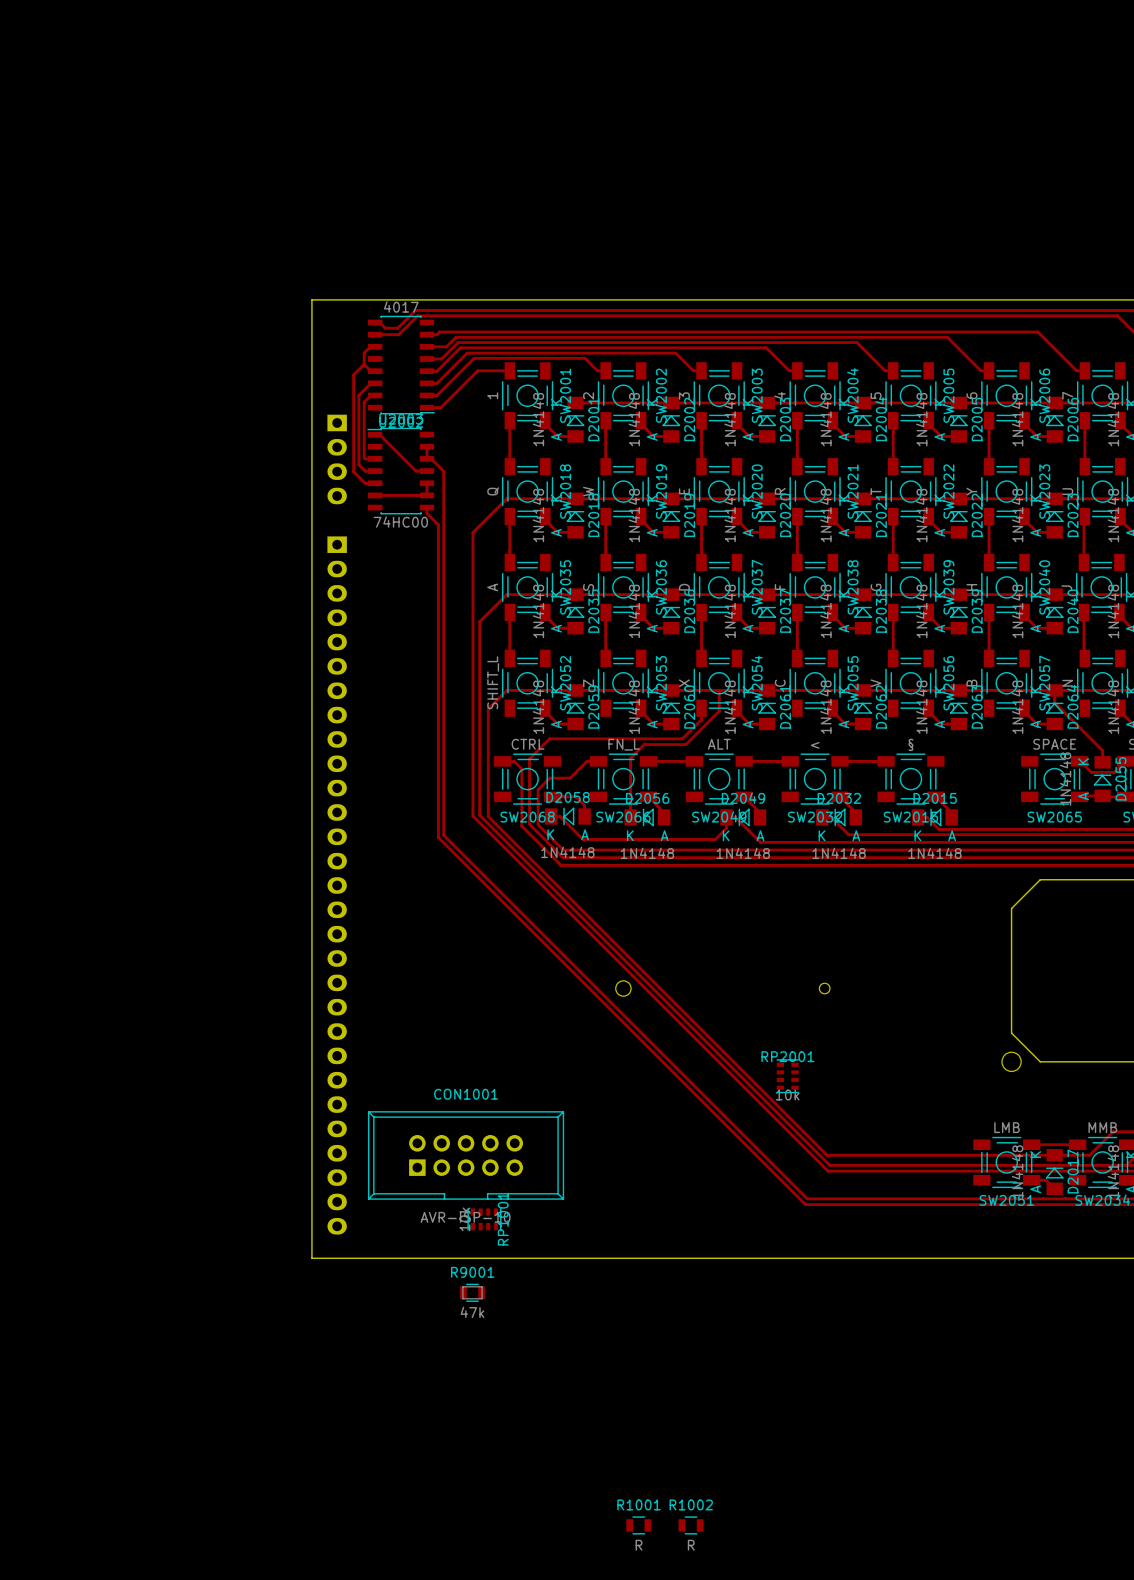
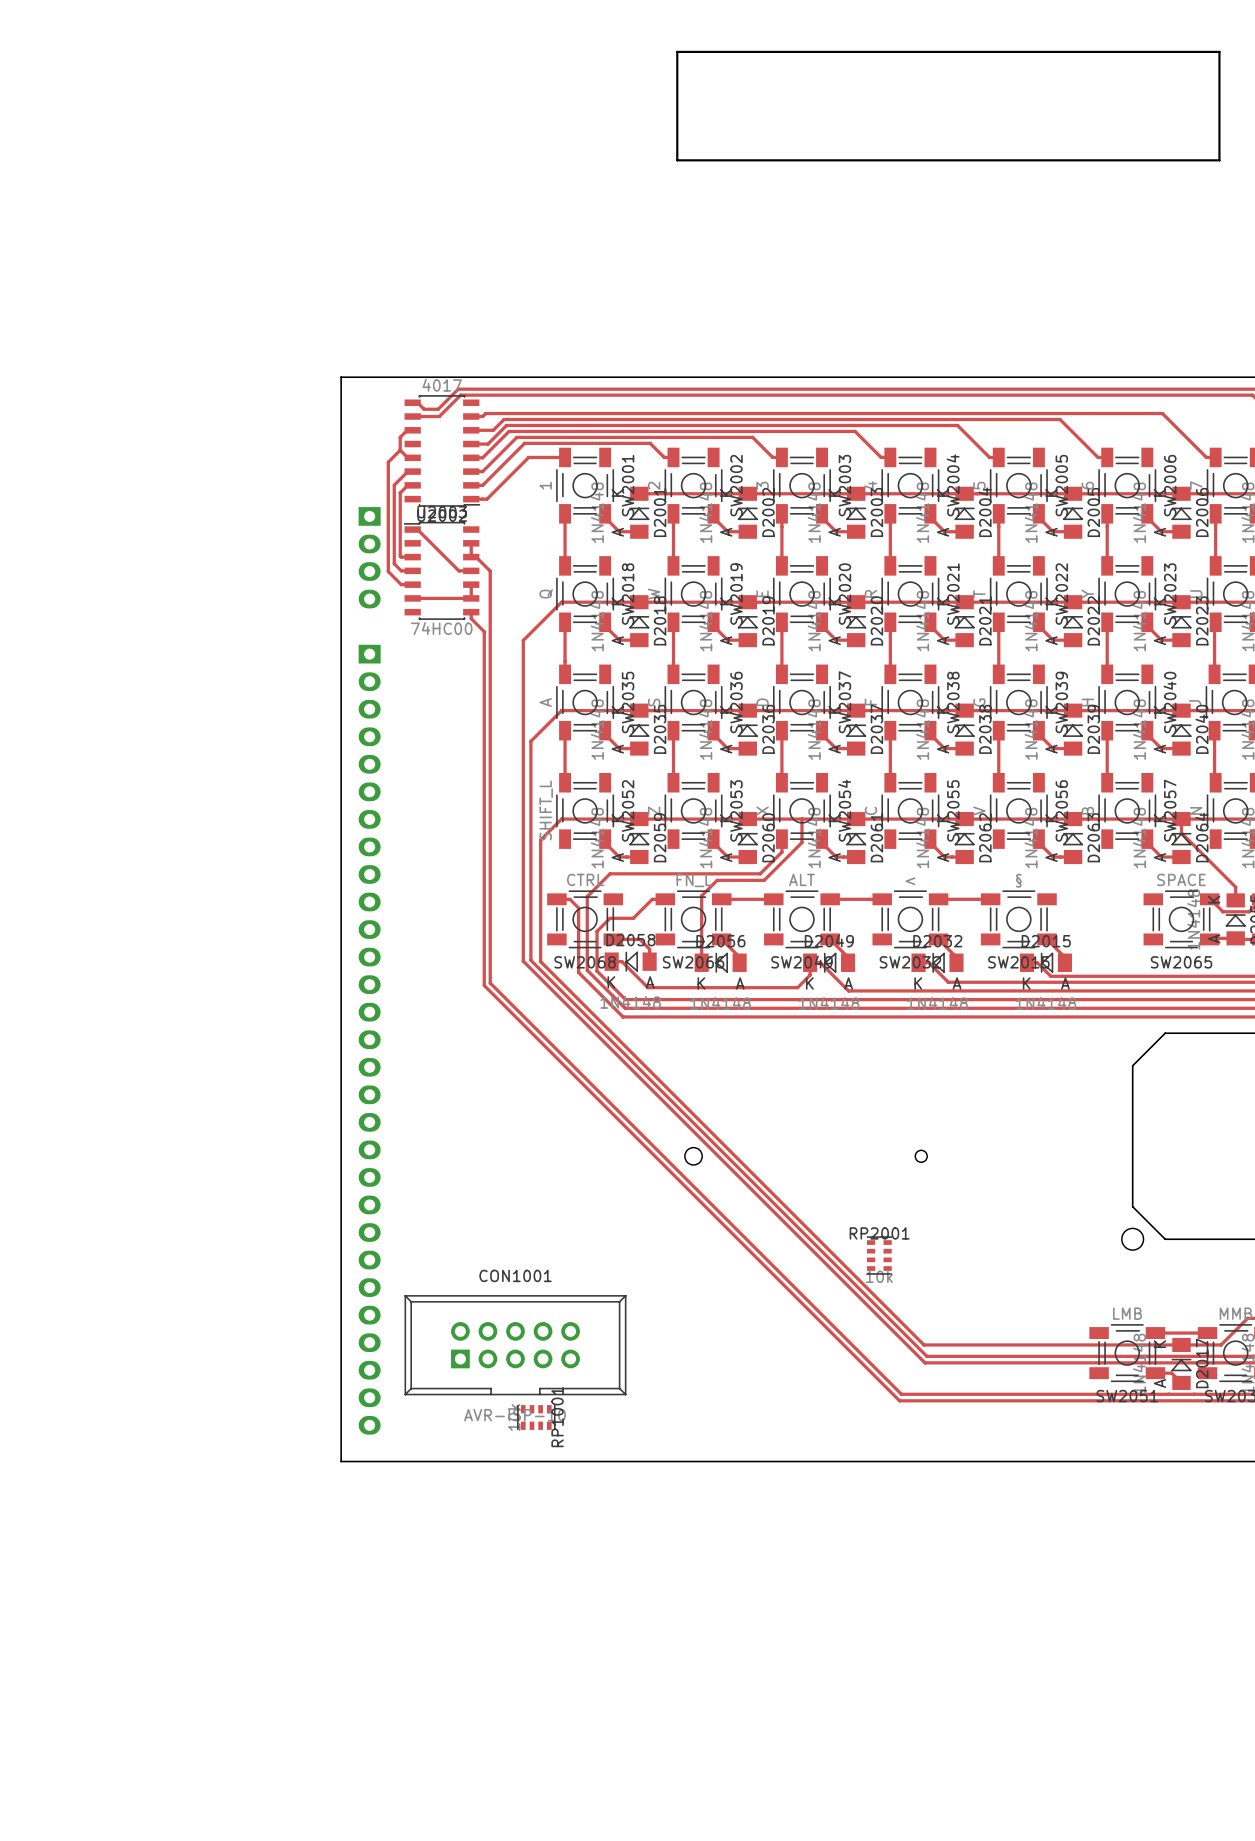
board edge: none -> (677, 51) (677, 160) (1219, 160) (1219, 51) (677, 51)
R9001: 47k (472, 1292) -> none
R1001: R (638, 1525) -> none
R1002: R (691, 1525) -> none

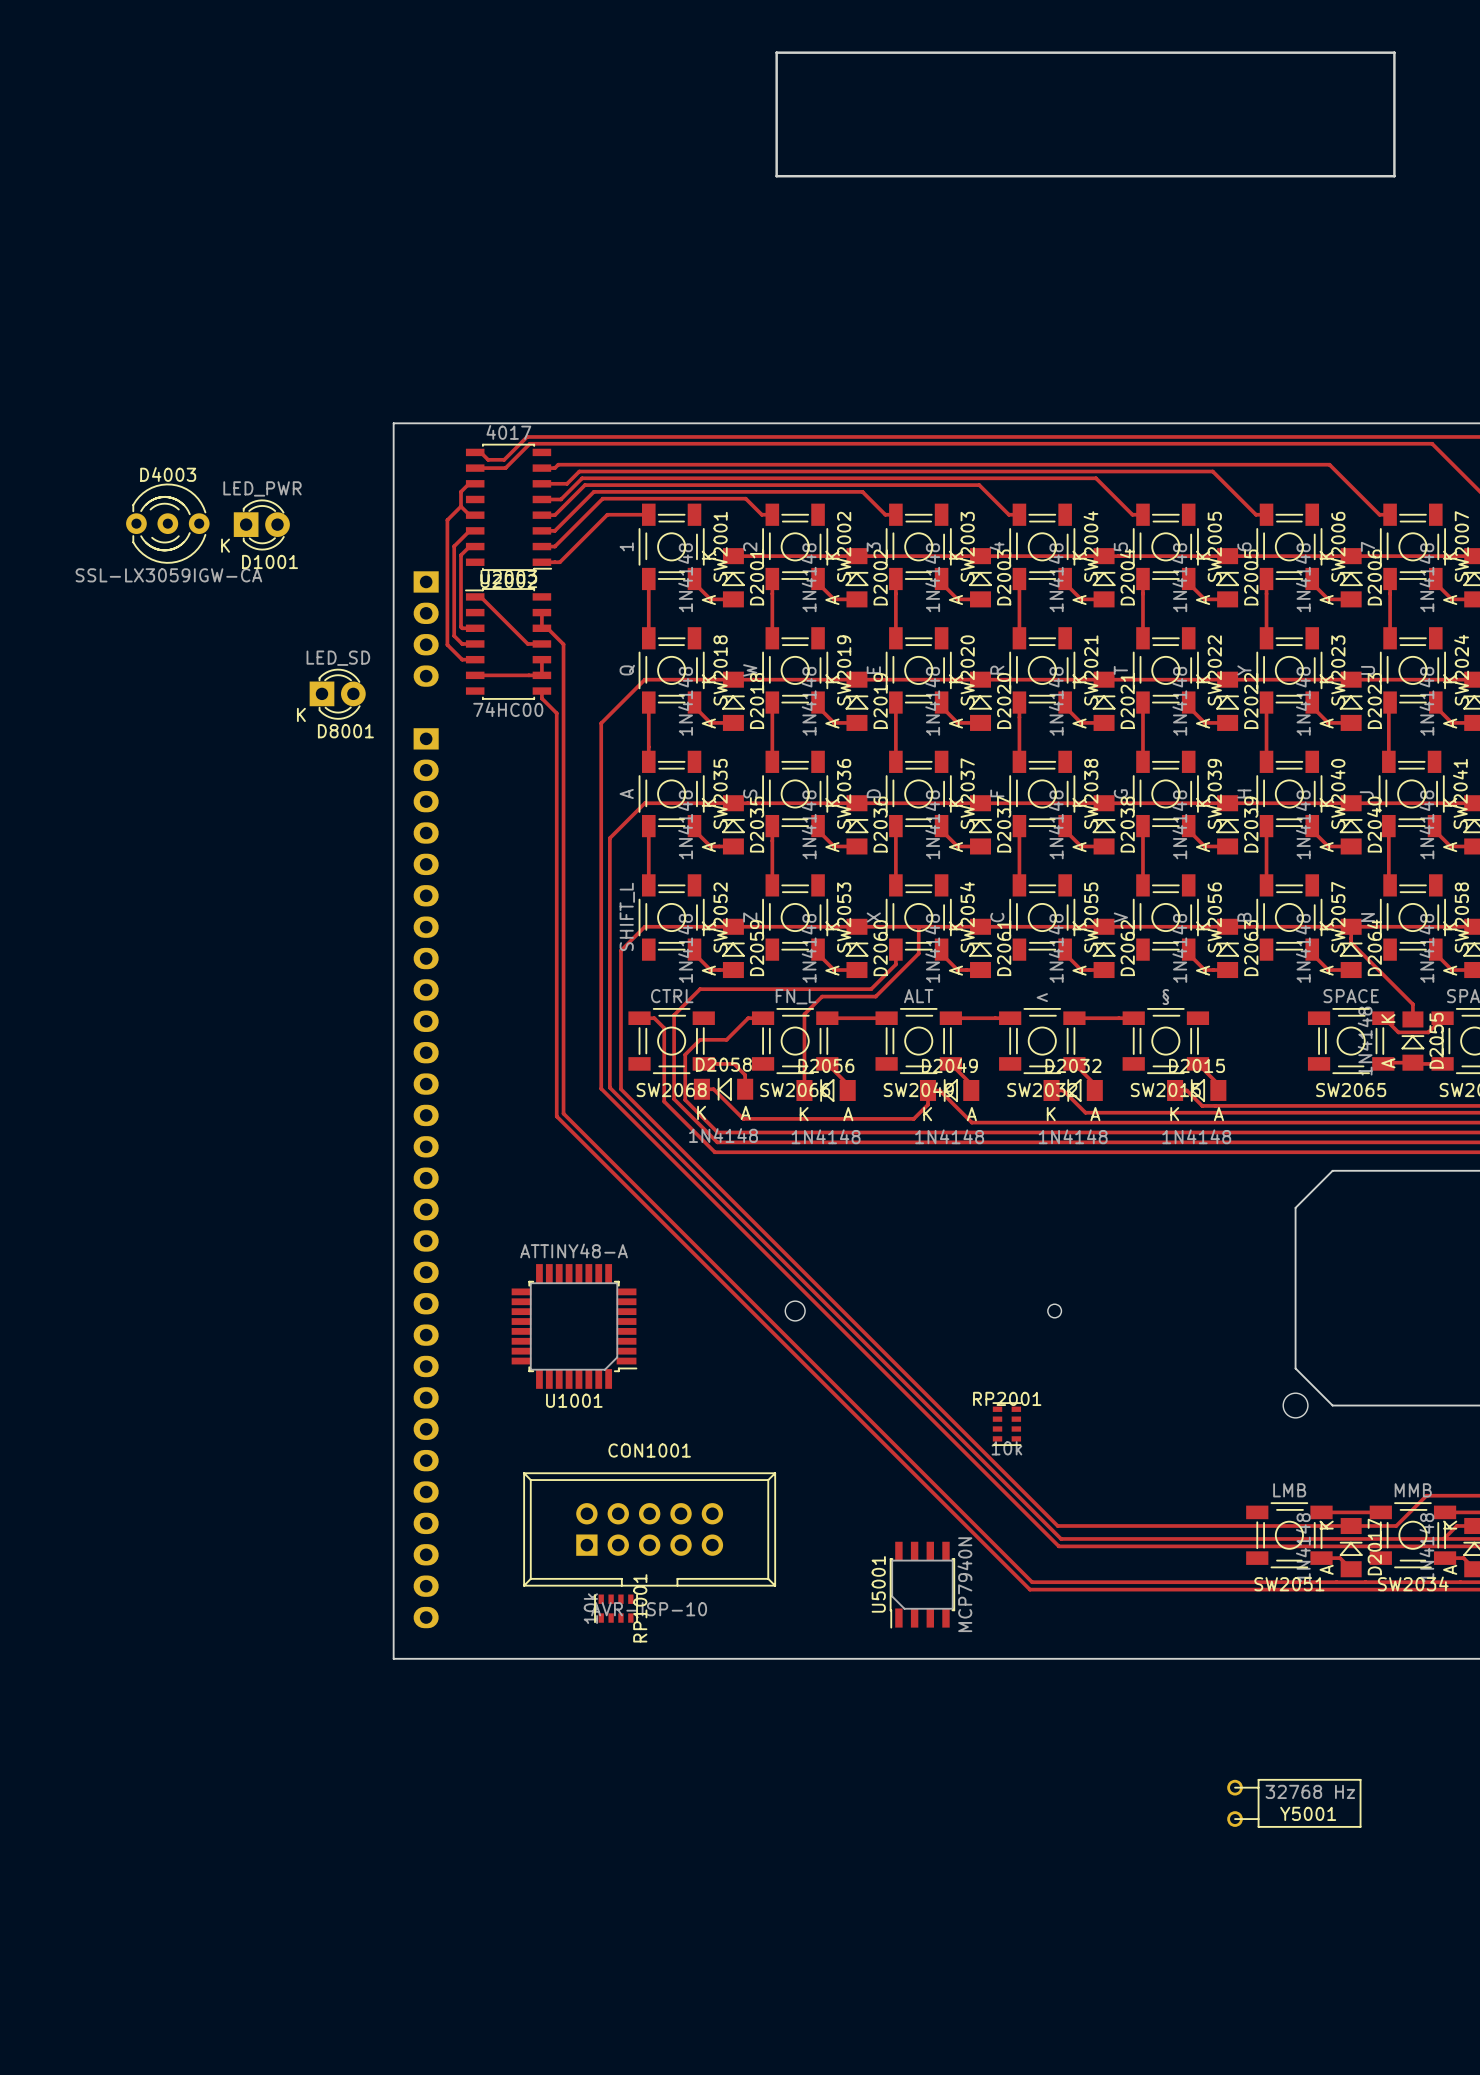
D4003: none -> SSL-LX3059IGW-CA (167, 523)
D1001: none -> LED_PWR (261, 524)
D8001: none -> LED_SD (337, 694)
U1001: none -> ATTINY48-A (574, 1326)
CON1001 position: (515, 1345) -> (649, 1529)
U5001: none -> MCP7940N (922, 1585)
Y5001: none -> 32768 Hz (1294, 1803)

